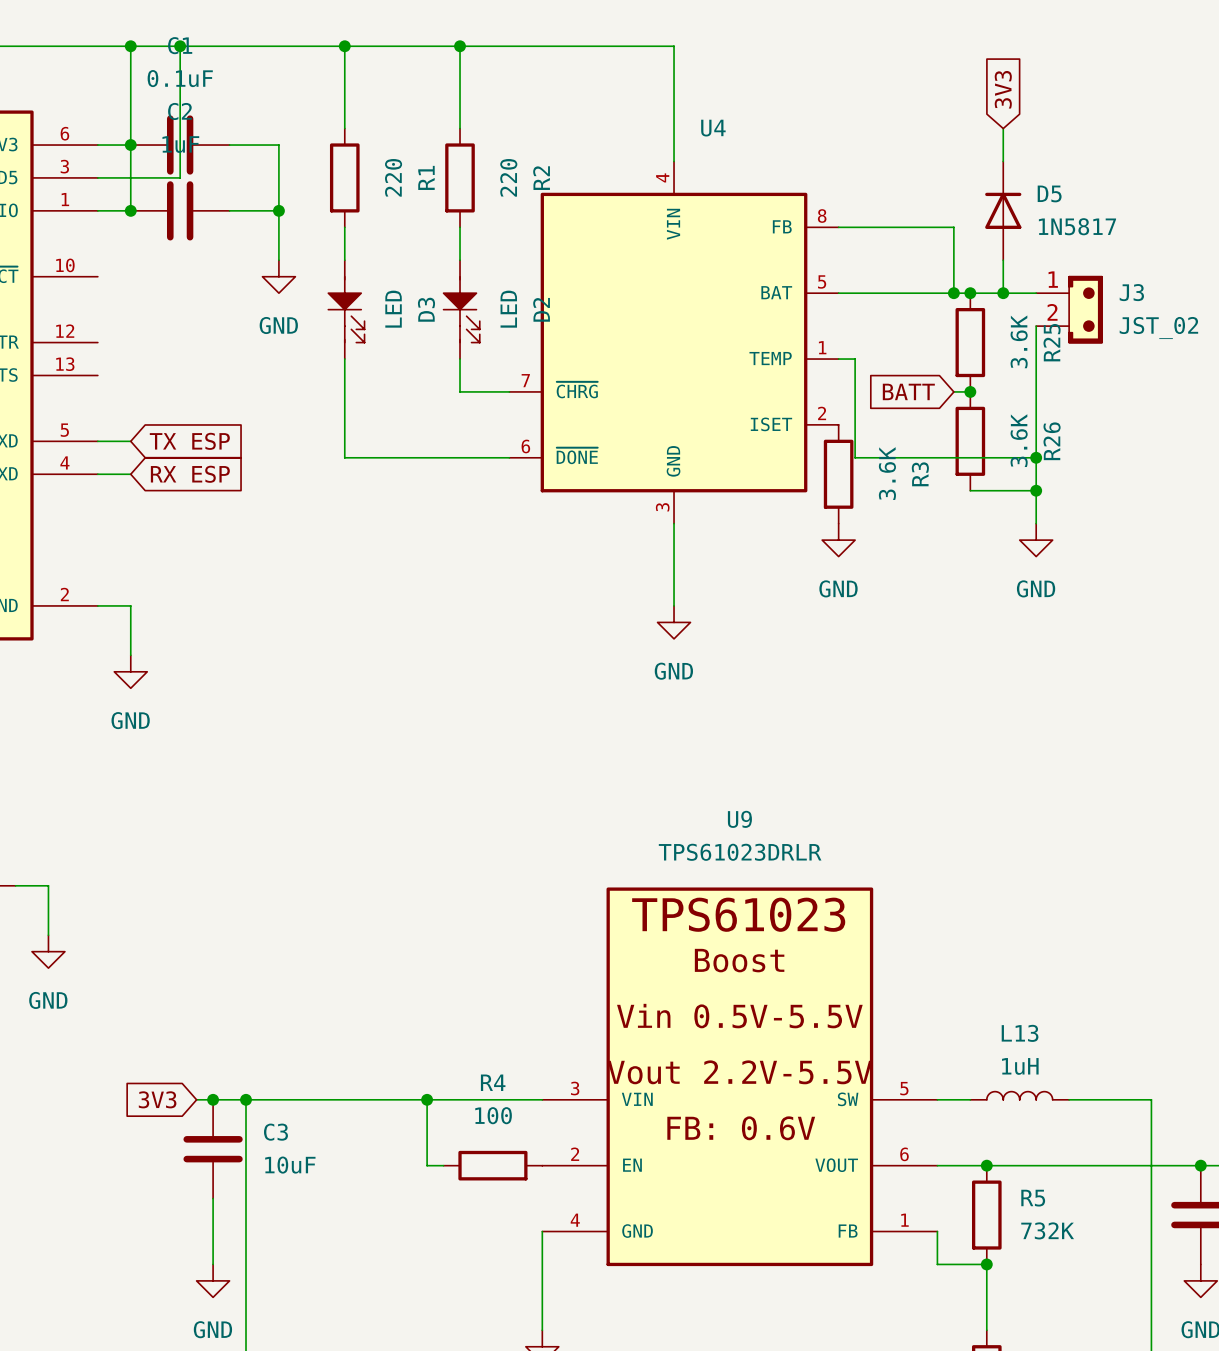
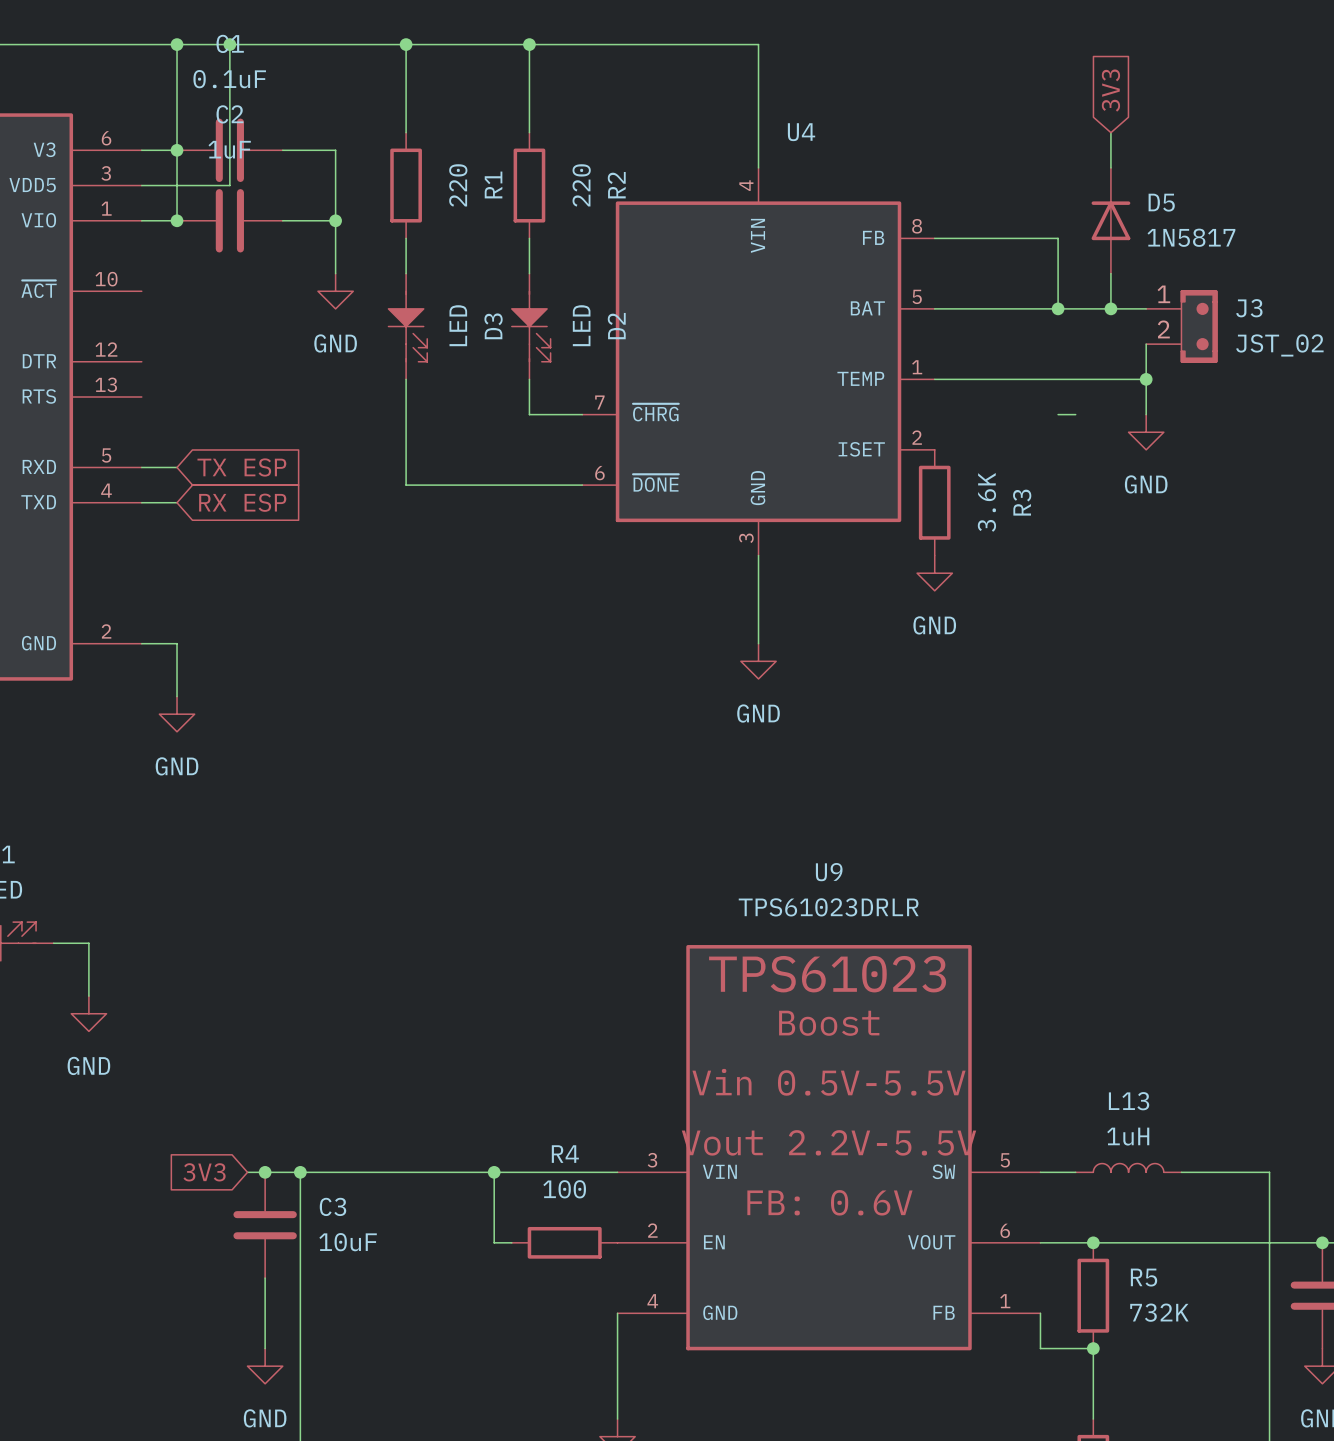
junction: (970, 293) -> none
R25: 3.6K (970, 342) -> none
wire: (855, 359) (855, 457) (1036, 457) -> (952, 379) (1146, 379)
junction: none -> (1146, 379)
global label: BATT (908, 391) -> none
junction: (970, 391) -> none
wire: (1036, 391) (1036, 523) -> none
R26: 3.6K (970, 441) -> none
junction: (1036, 457) -> none
wire: (970, 490) (1036, 490) -> none
junction: (1036, 490) -> none
power symbol position: GND (1036, 540) -> GND (1146, 432)

